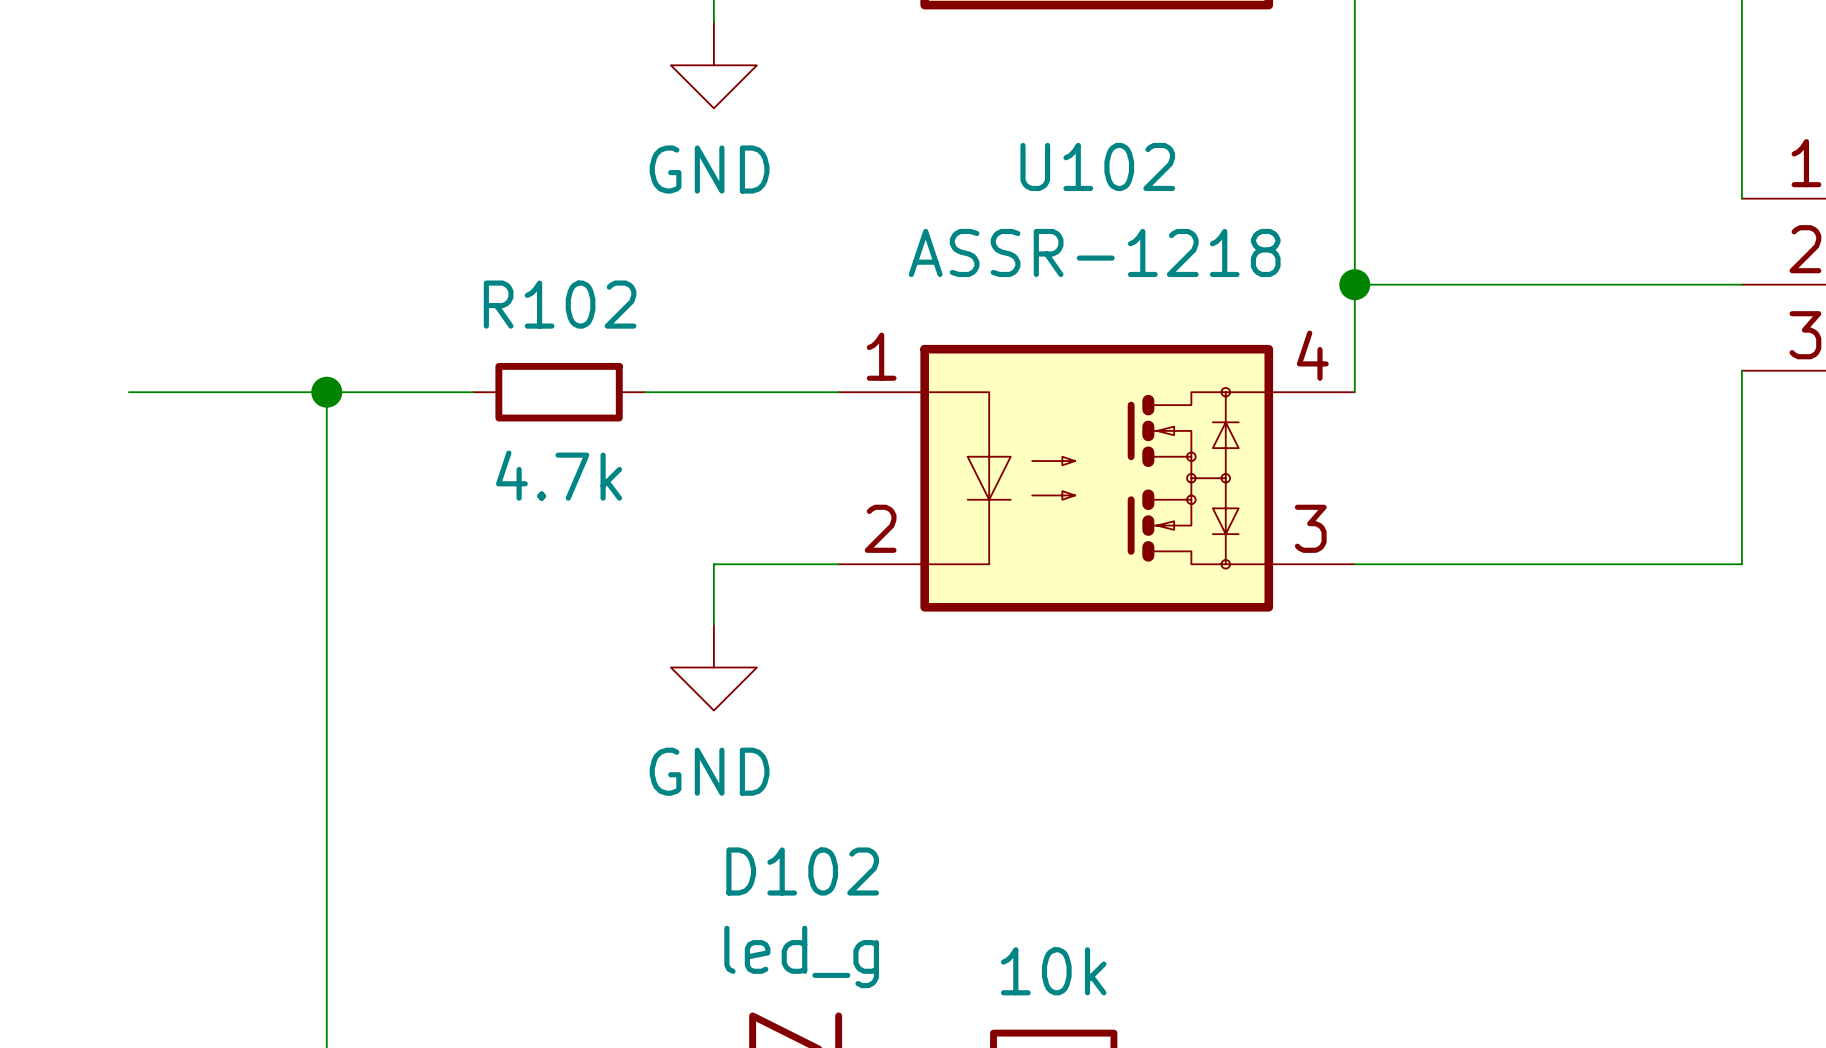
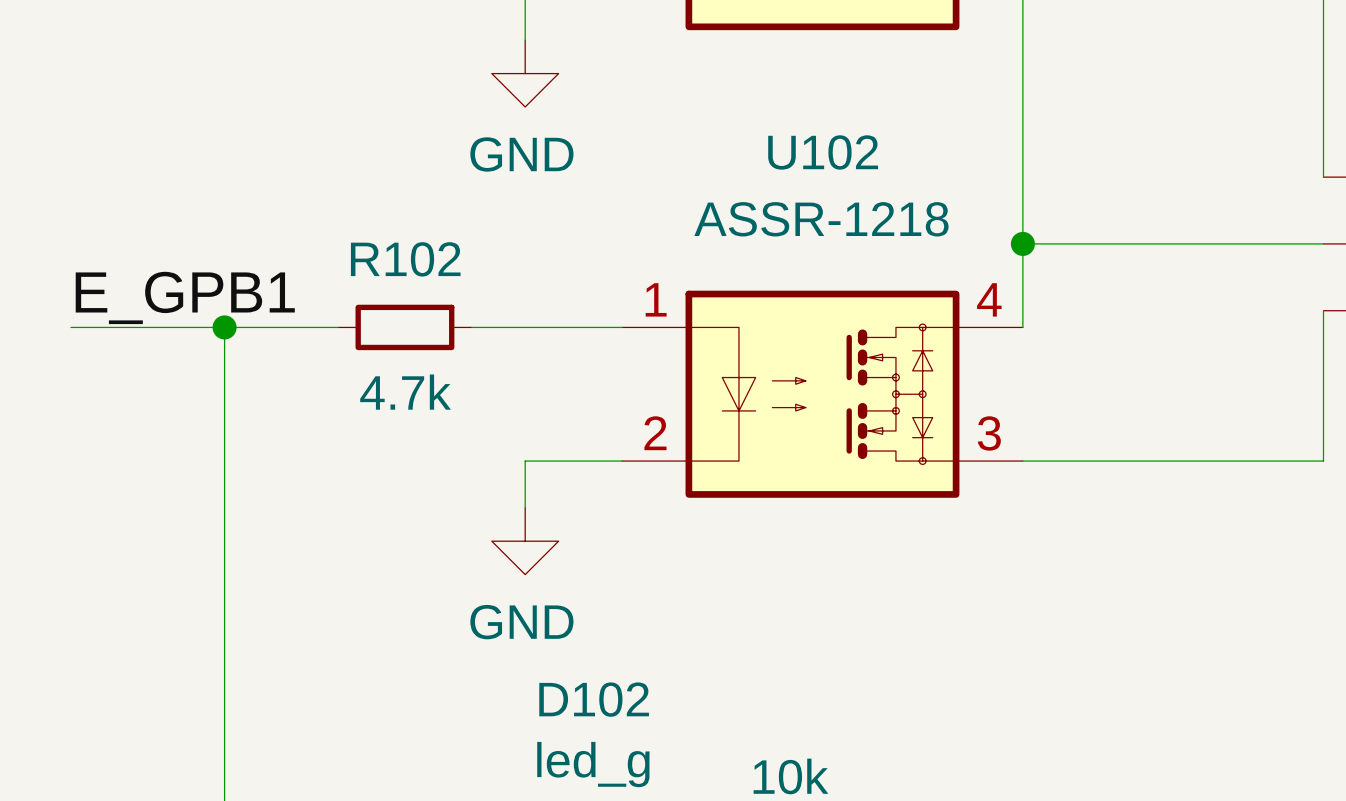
label: none -> E_GPB1 (185, 297)

